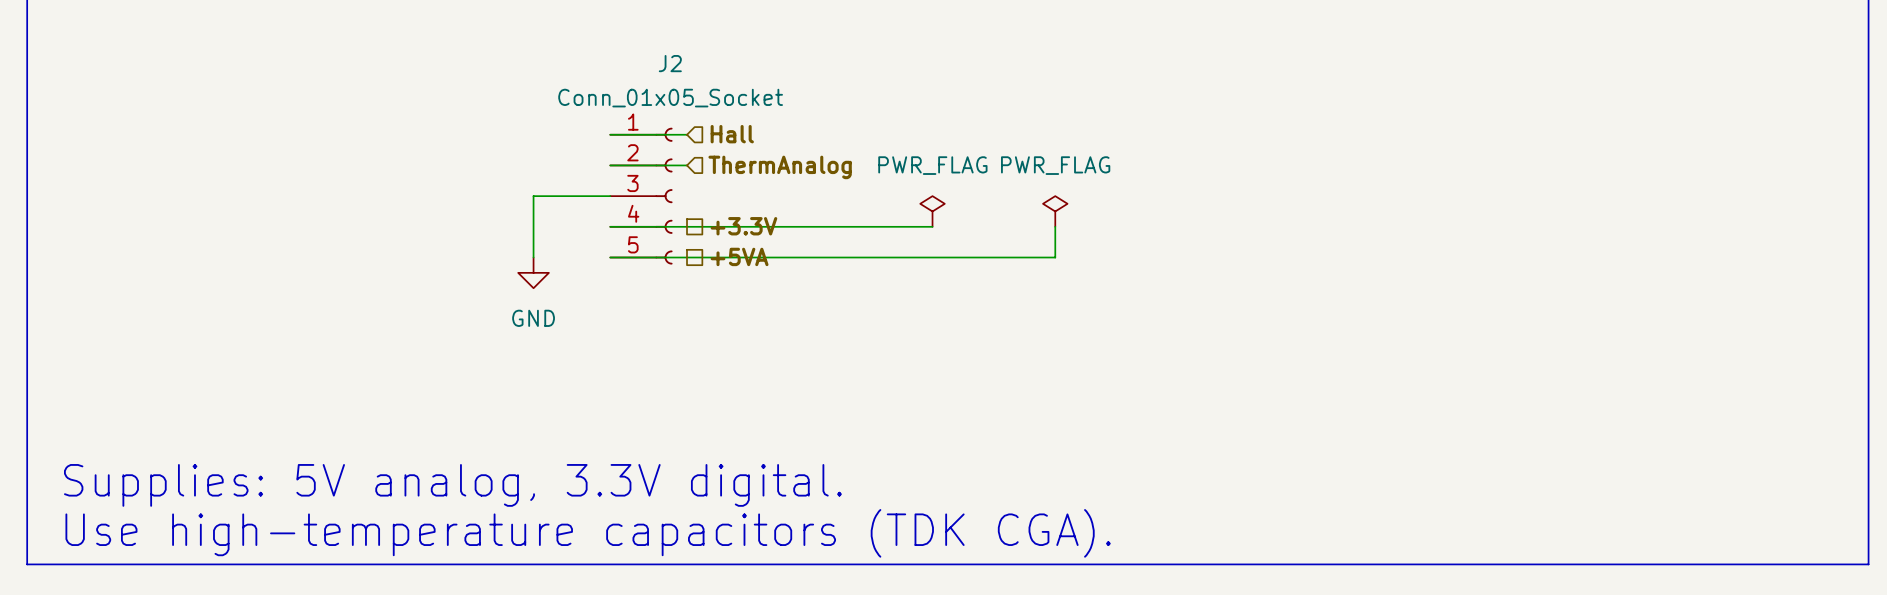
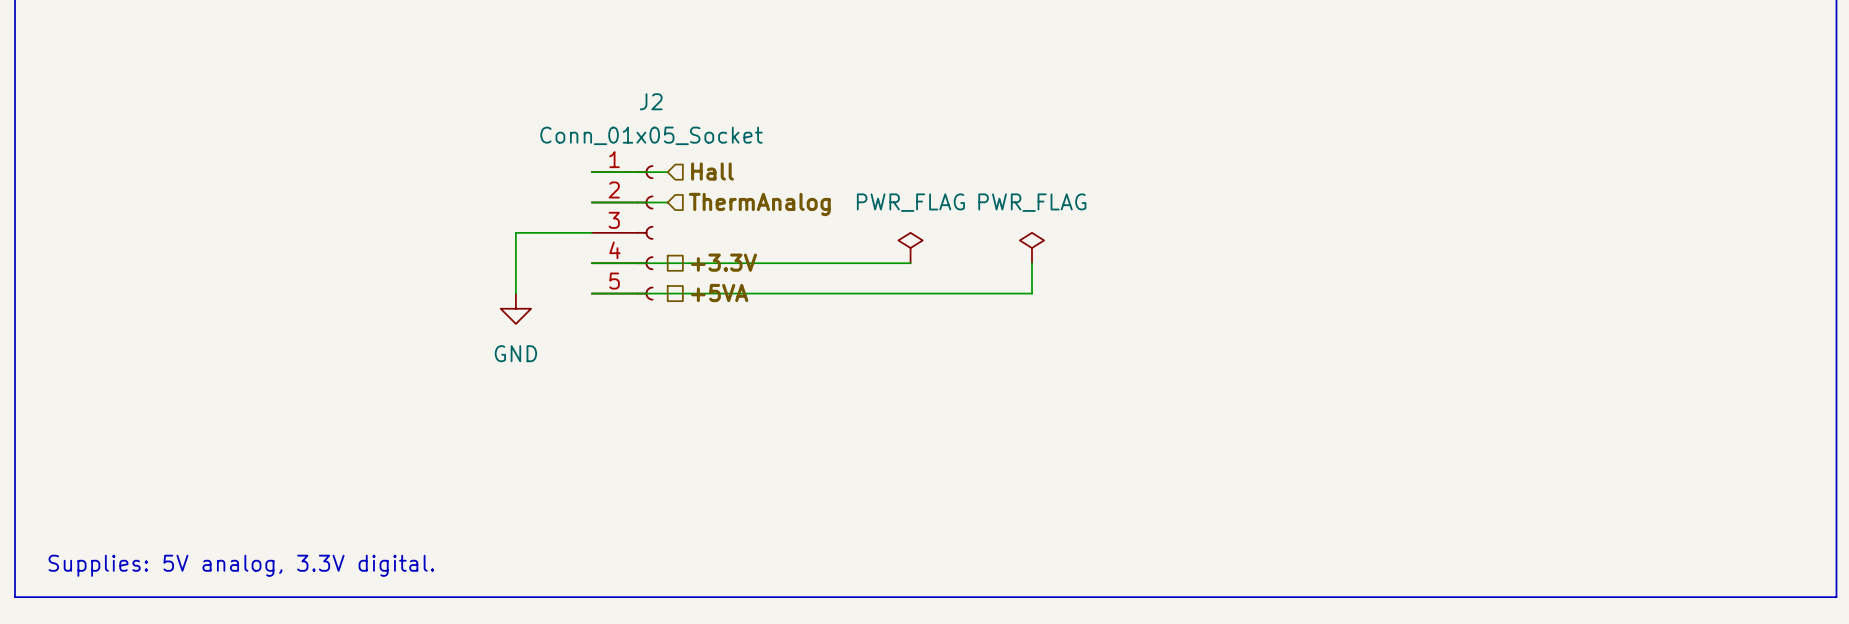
text: Supplies: 5V analog, 3.3V digital. (452, 485) -> none
text: Use high-temperature capacitors (TDK CGA). (588, 533) -> Supplies: 5V analog, 3.3V digital. (241, 565)

